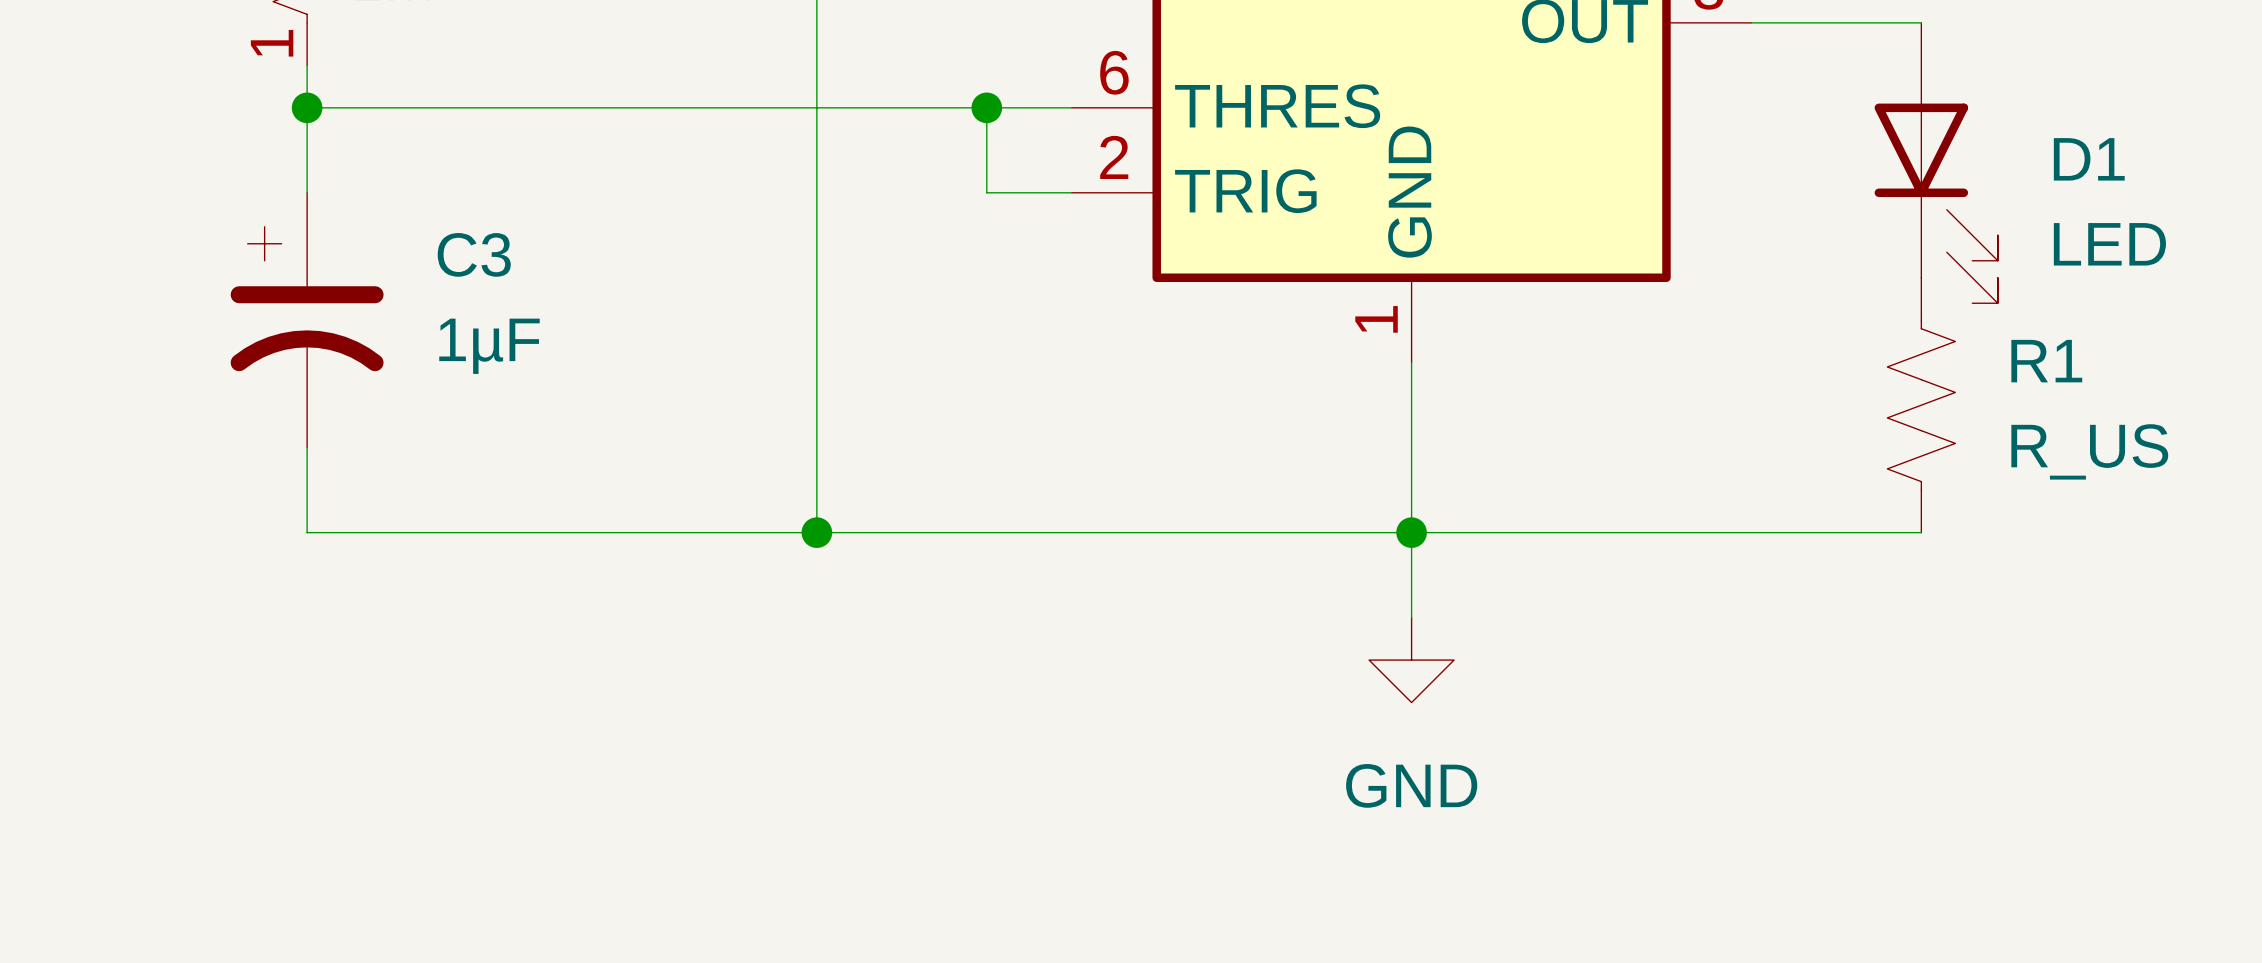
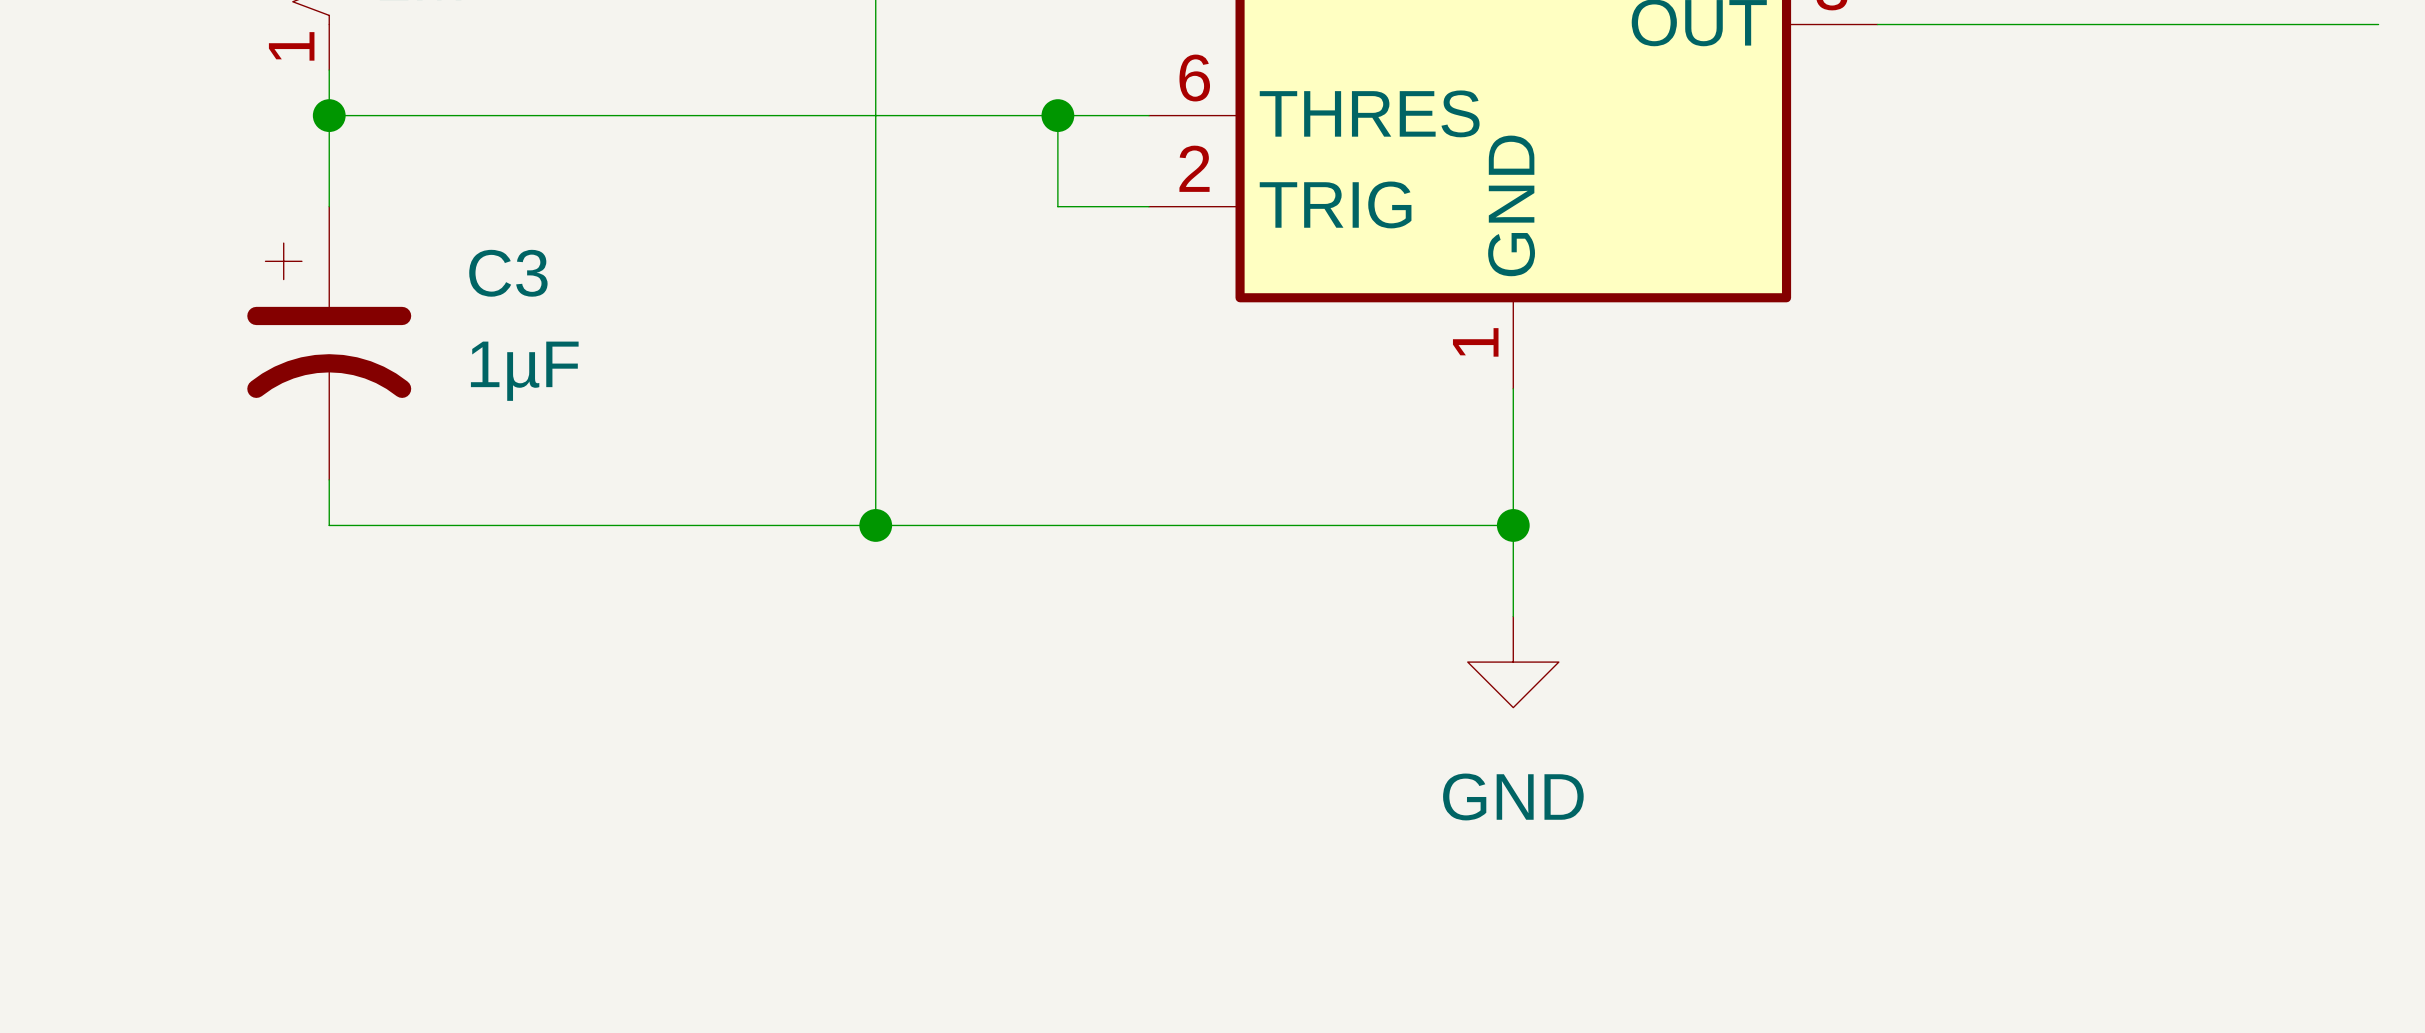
wire: none -> (2059, 24) (2378, 24)
D1: LED (1936, 163) -> none
R1: R_US (1921, 405) -> none
wire: (307, 490) (307, 532) (1921, 532) -> (329, 525) (1513, 525)
wire: (816, 490) (816, 532) -> none
junction position: (816, 532) -> (875, 525)
junction position: (1411, 532) -> (1513, 525)
power symbol position: GND (1411, 660) -> GND (1513, 662)

